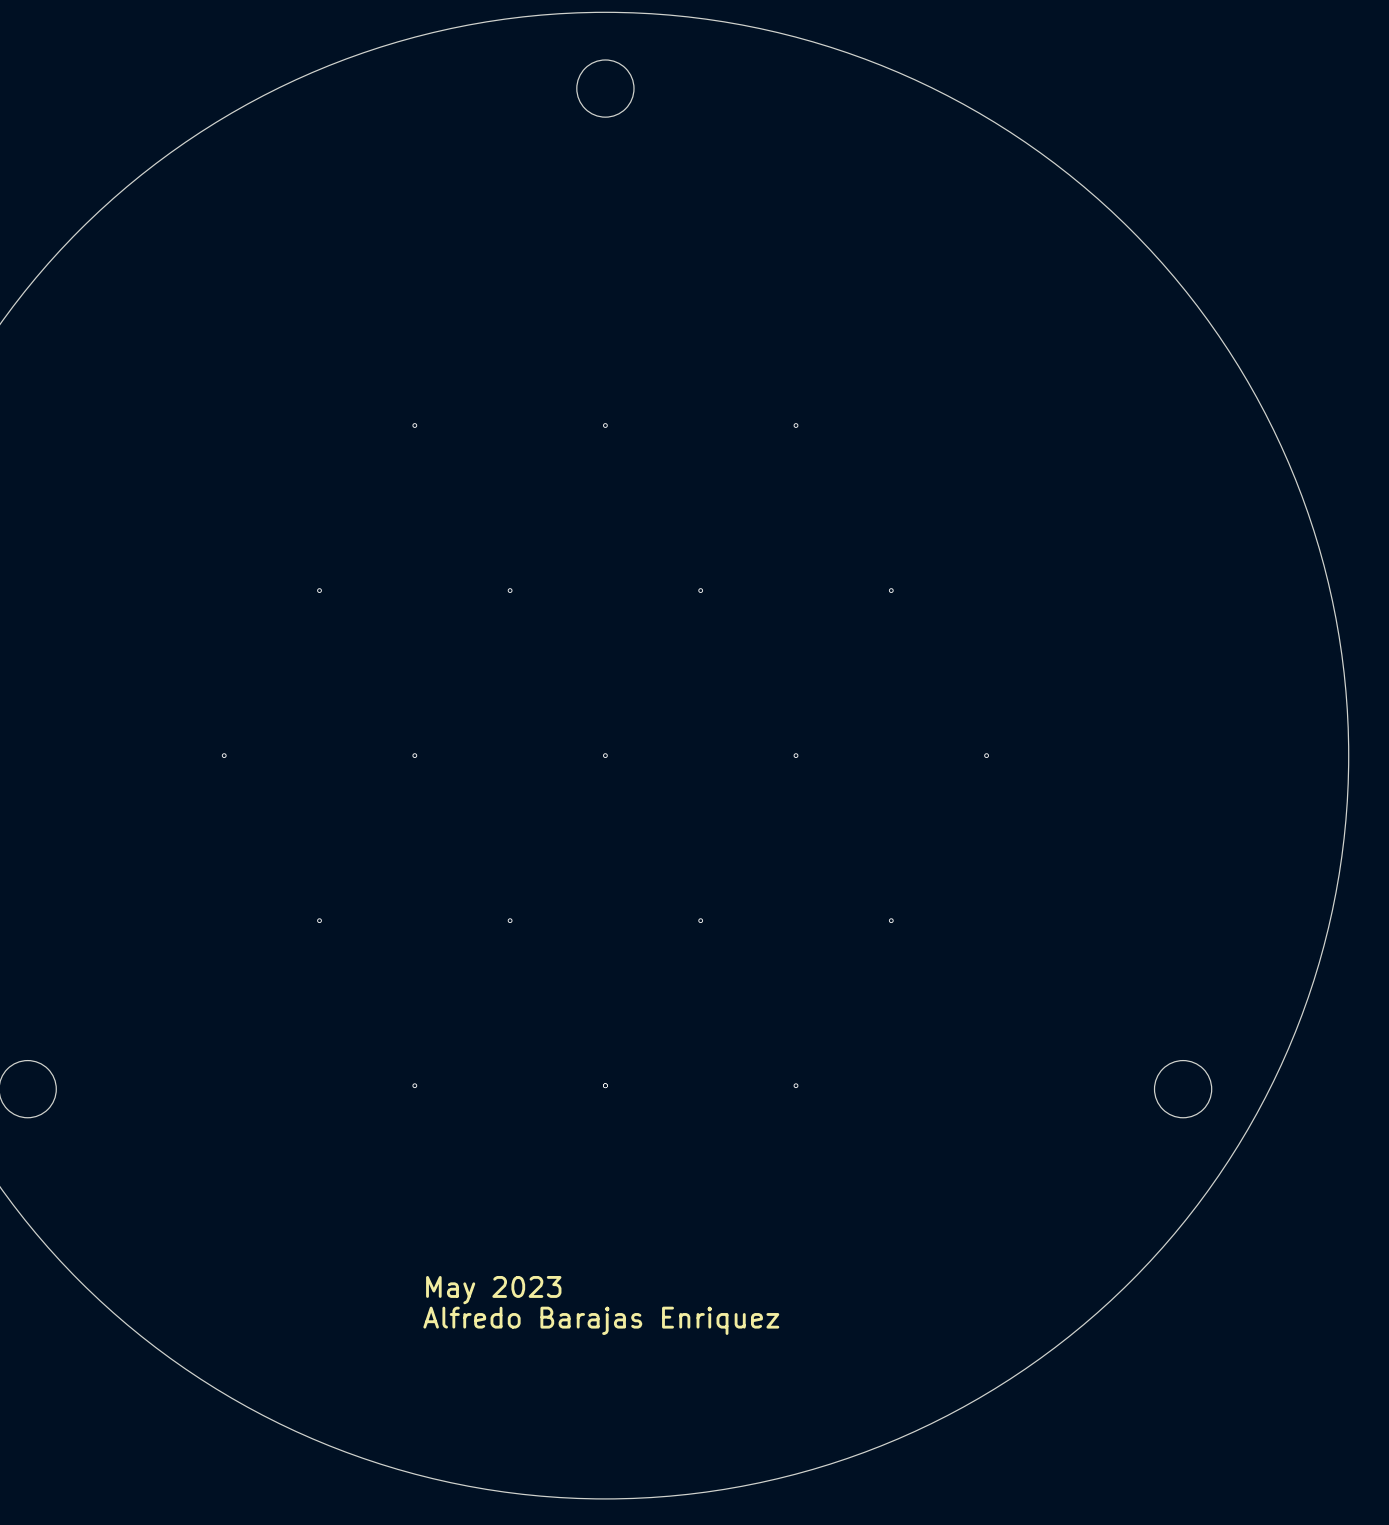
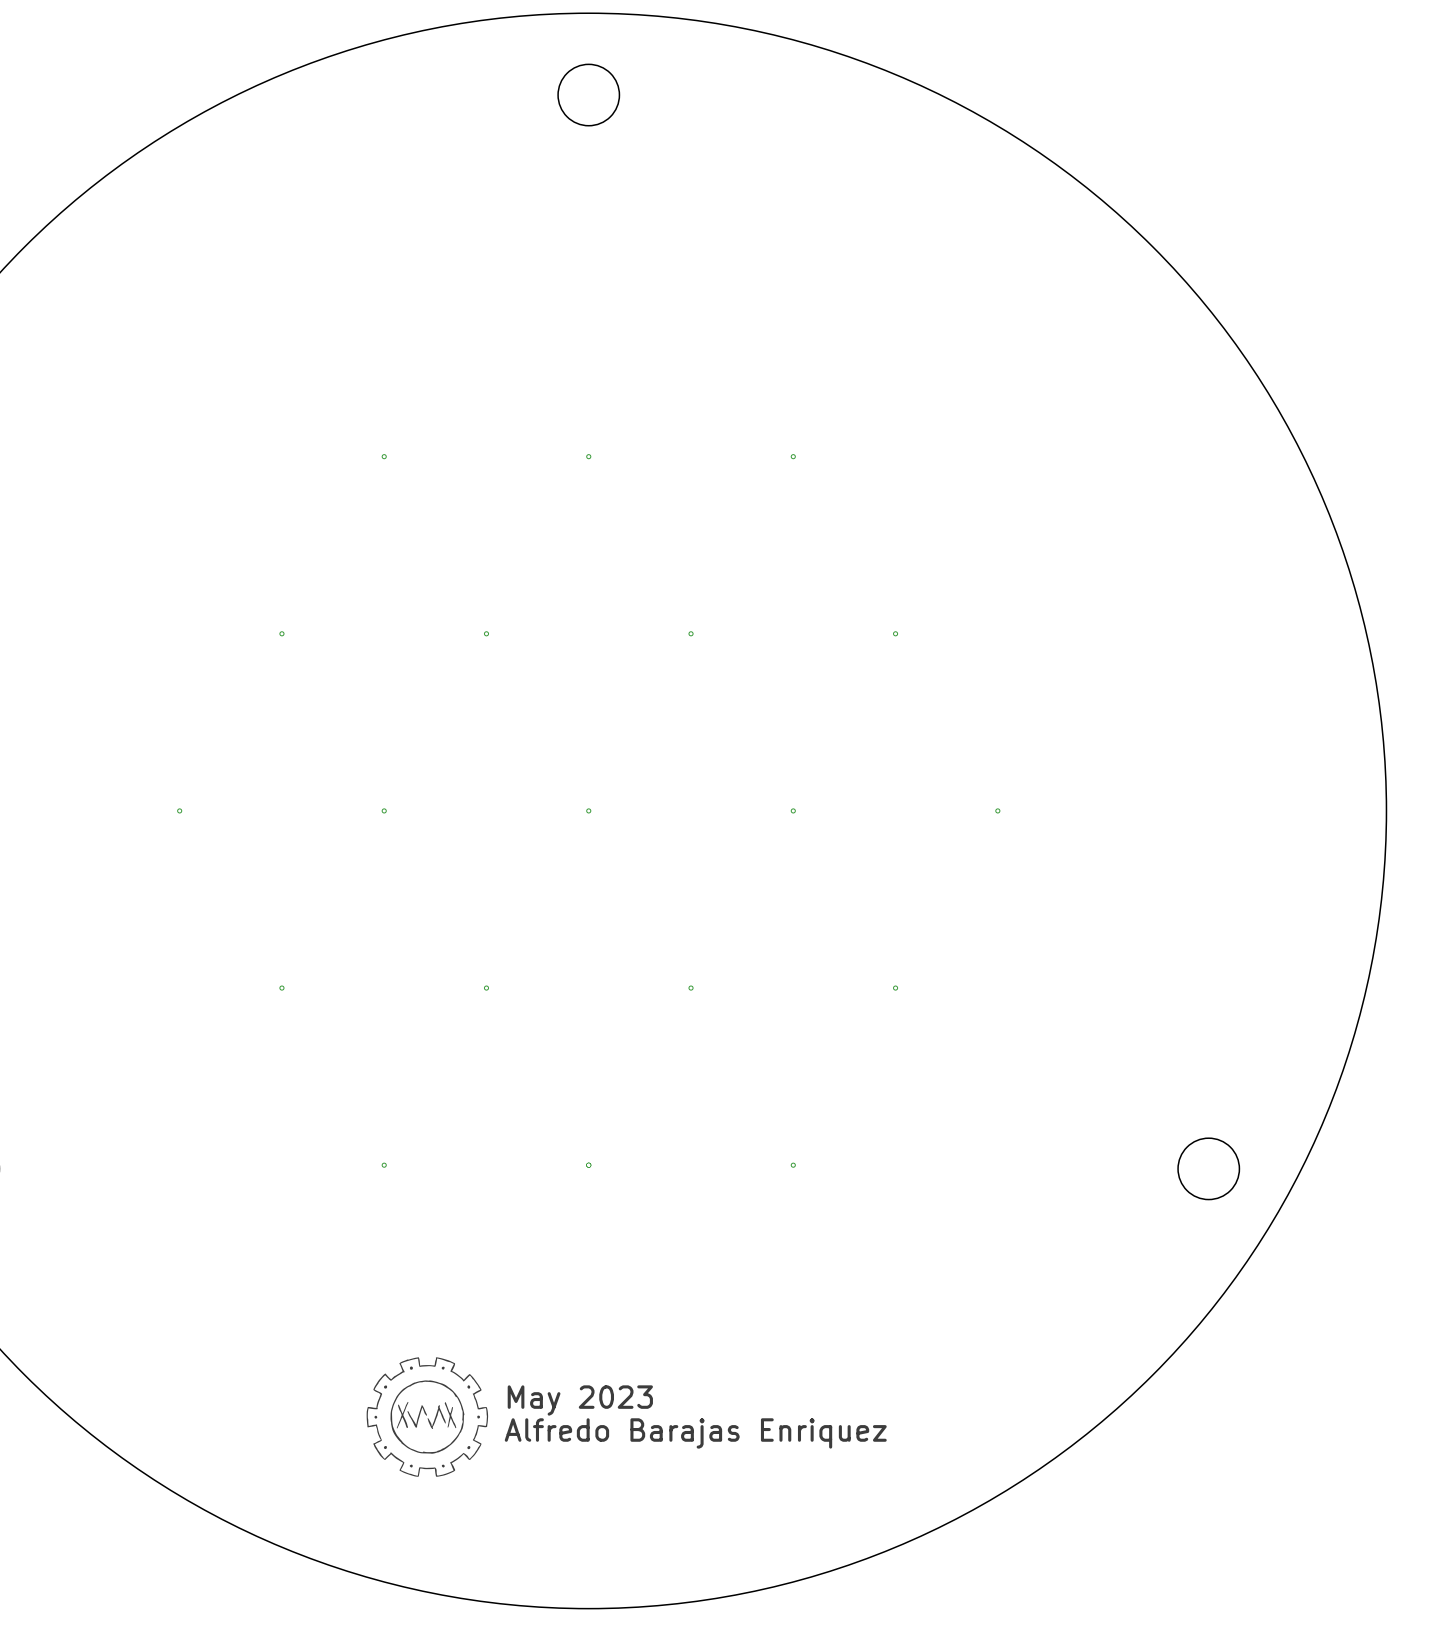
drawing: none -> [366, 1357, 489, 1477]
text position: May 2023 (493, 1290) -> May 2023 (580, 1400)
text position: Alfredo Barajas Enriquez (601, 1320) -> Alfredo Barajas Enriquez (695, 1433)

